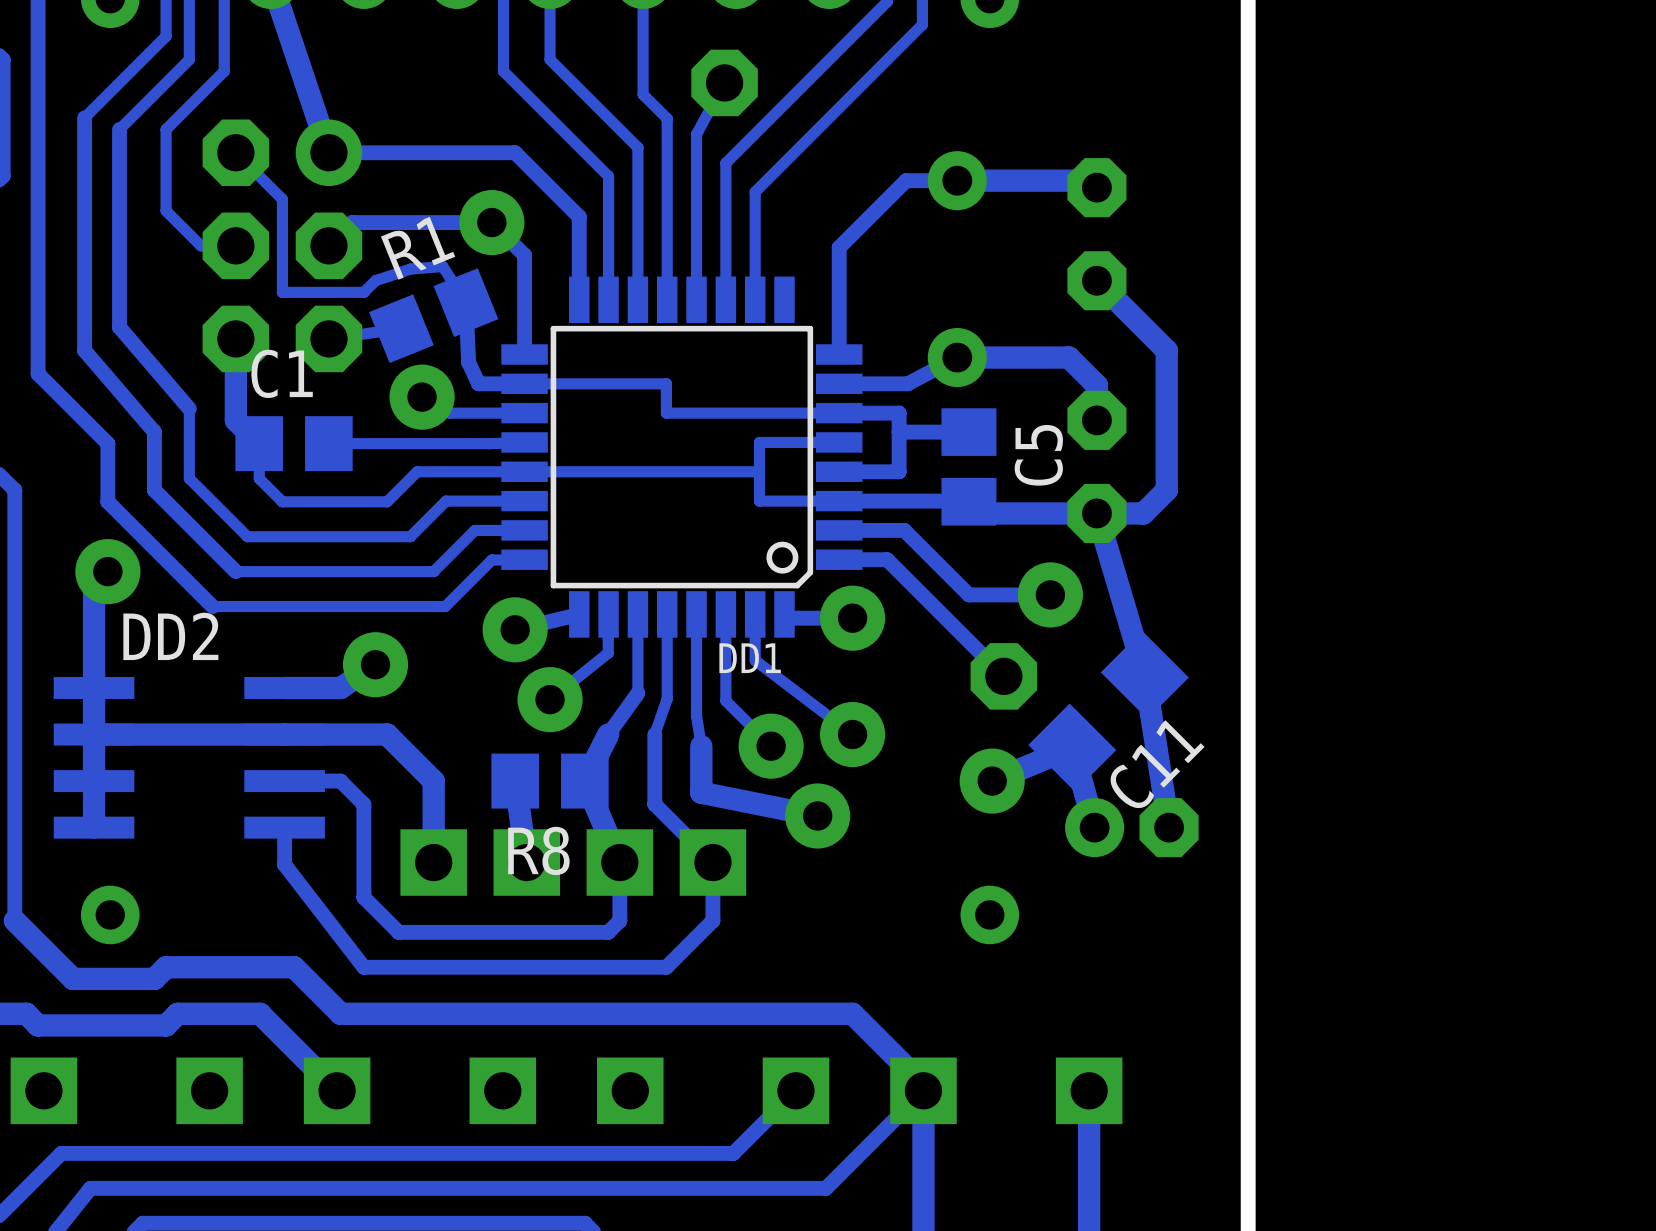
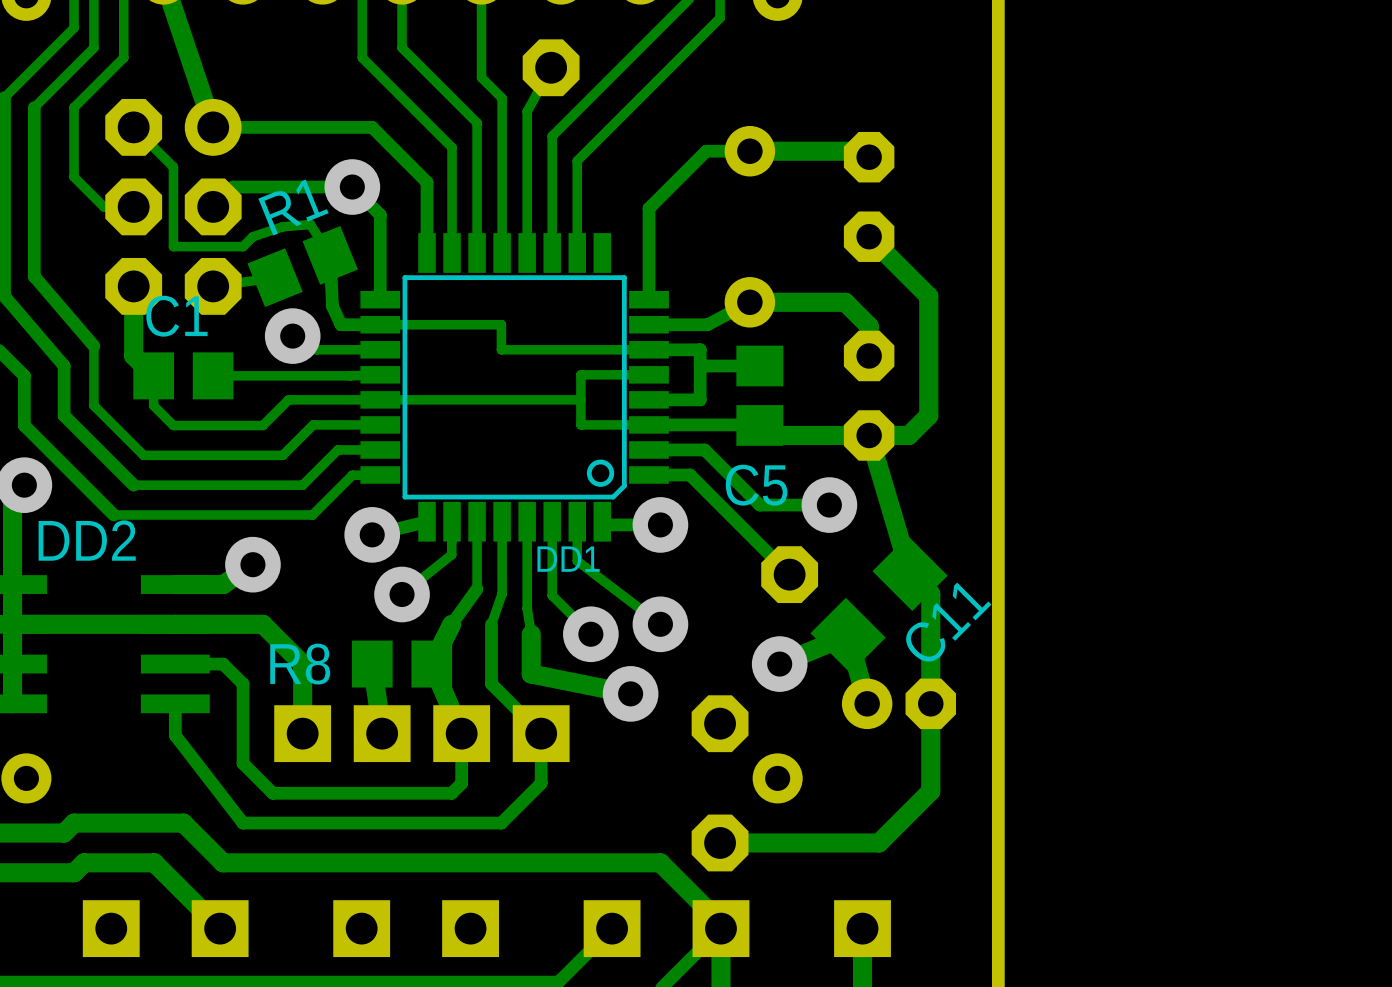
C5 name rotation: 0° (1038, 455) -> 90° clockwise (756, 485)
C5 name position: C5 (1038, 455) -> C5 (756, 485)
track: (1144, 674) (1169, 827) -> (910, 573) (930, 594) (930, 791) (879, 842) (720, 842)
C11 name position: C11 (1157, 764) -> C11 (948, 622)
R8 name position: R8 (538, 850) -> R8 (300, 664)
part: none -> (720, 723)
part: none -> (720, 842)

